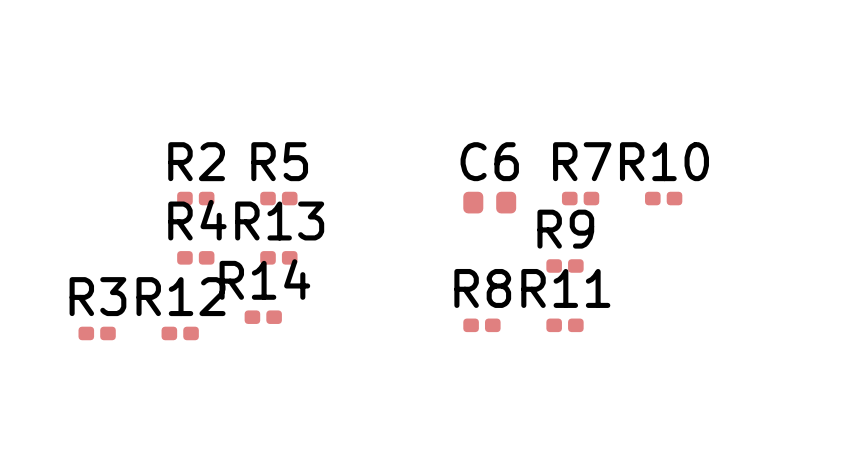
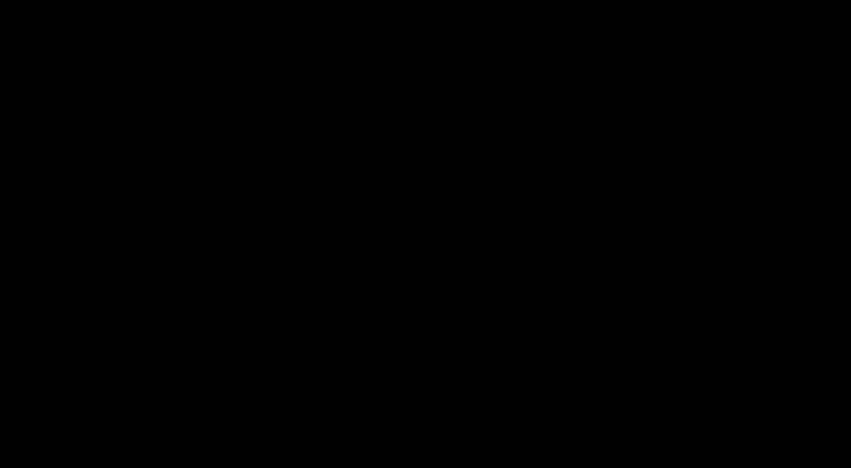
R2: (195, 198) -> none
R5: (278, 198) -> none
R7: (580, 198) -> none
R10: (663, 198) -> none
C6: (489, 202) -> none
R4: (195, 257) -> none
R13: (278, 257) -> none
R9: (565, 265) -> none
R14: (263, 317) -> none
R8: (481, 325) -> none
R11: (565, 325) -> none
R3: (97, 333) -> none
R12: (180, 333) -> none

